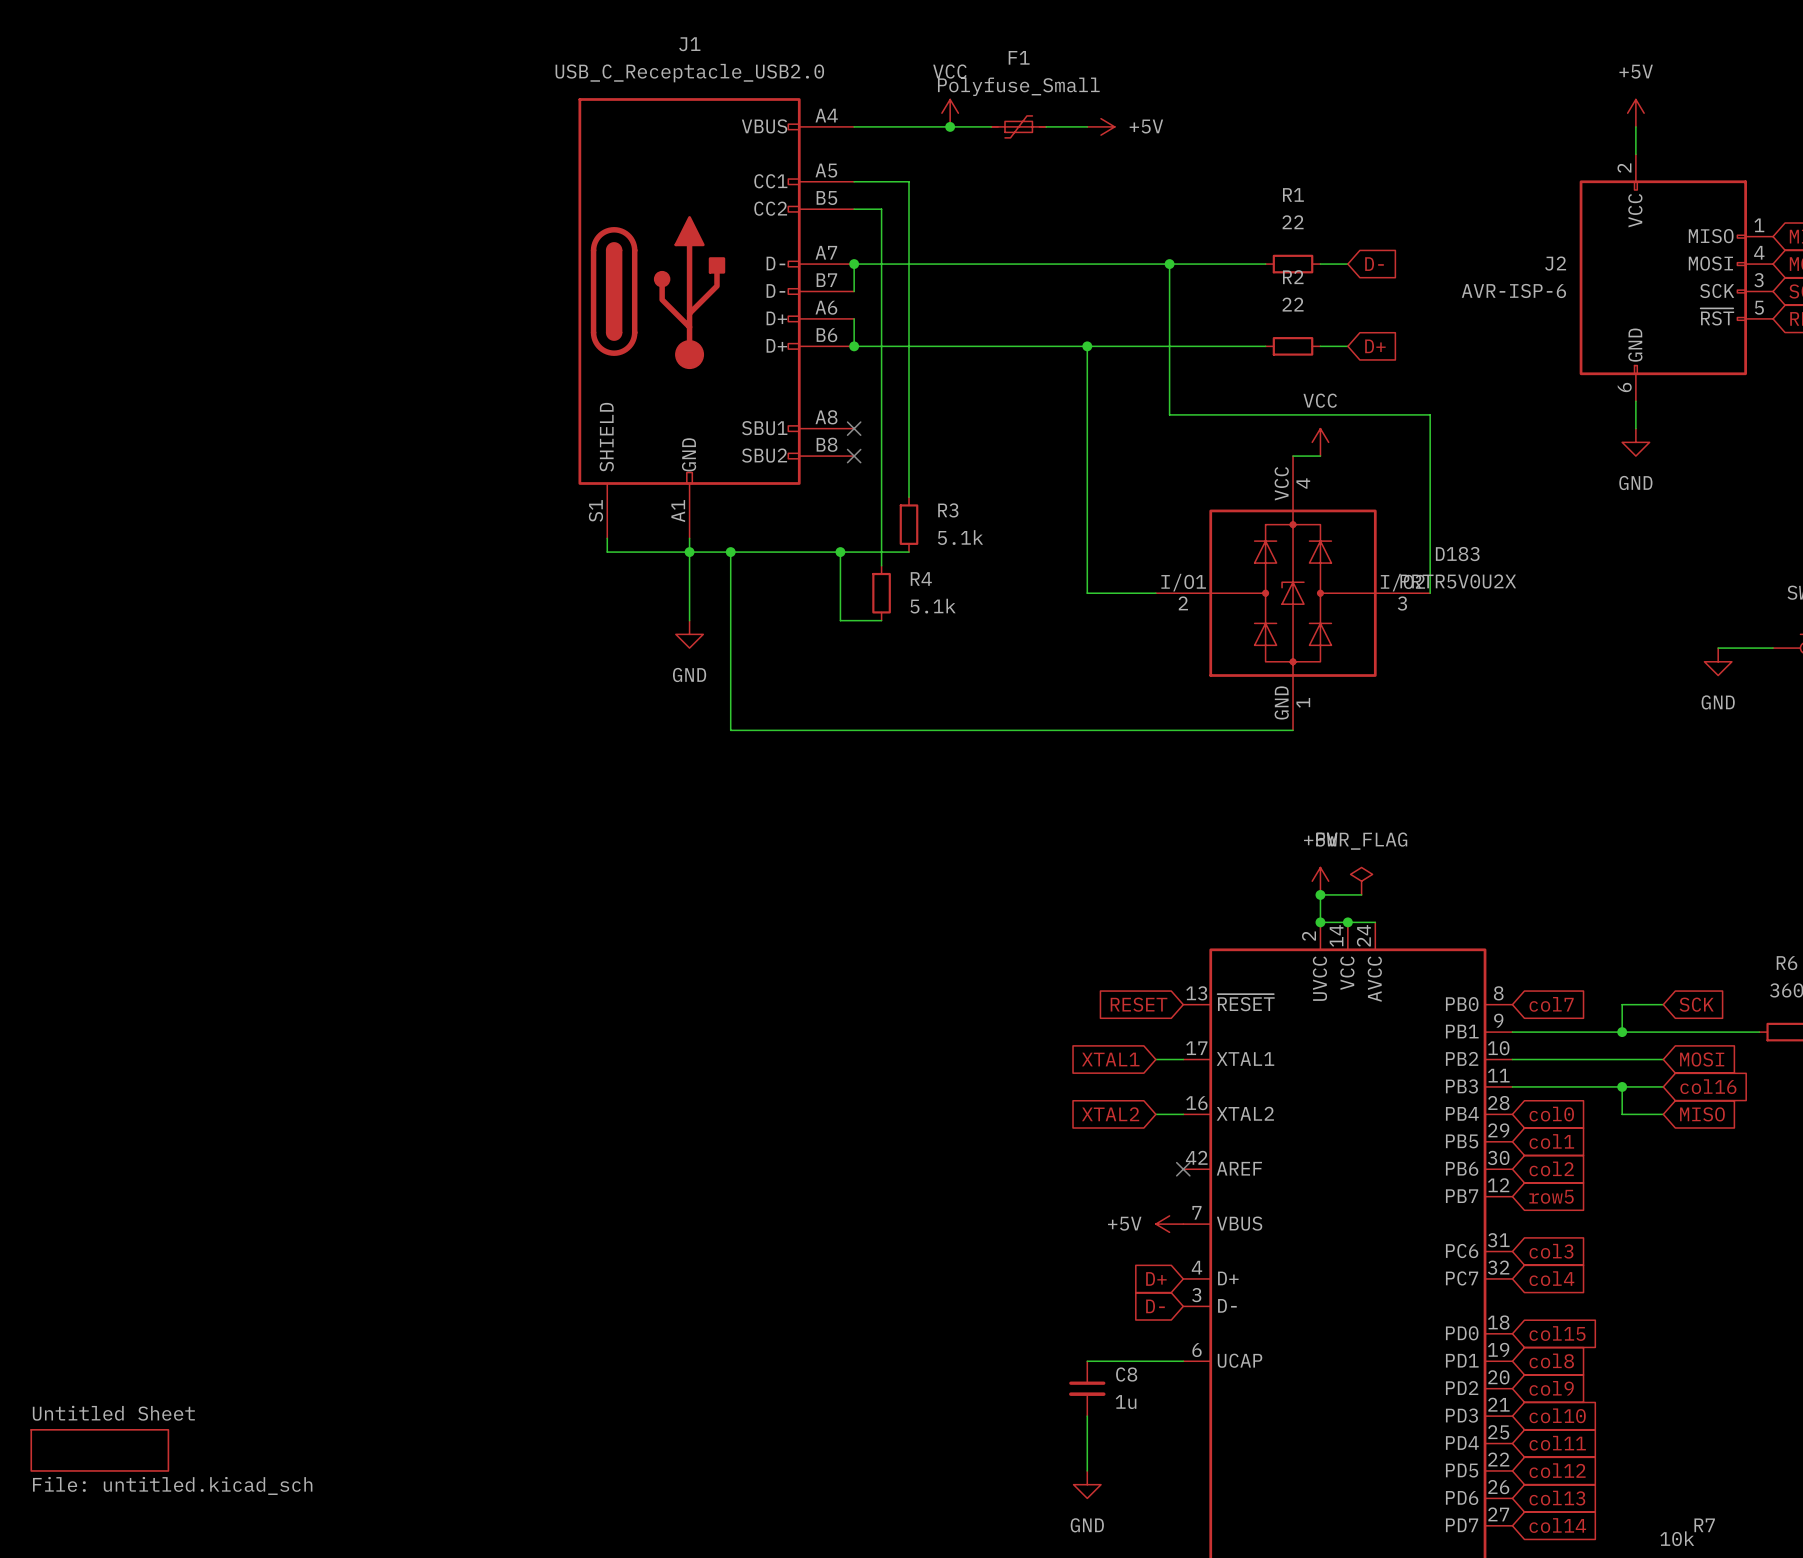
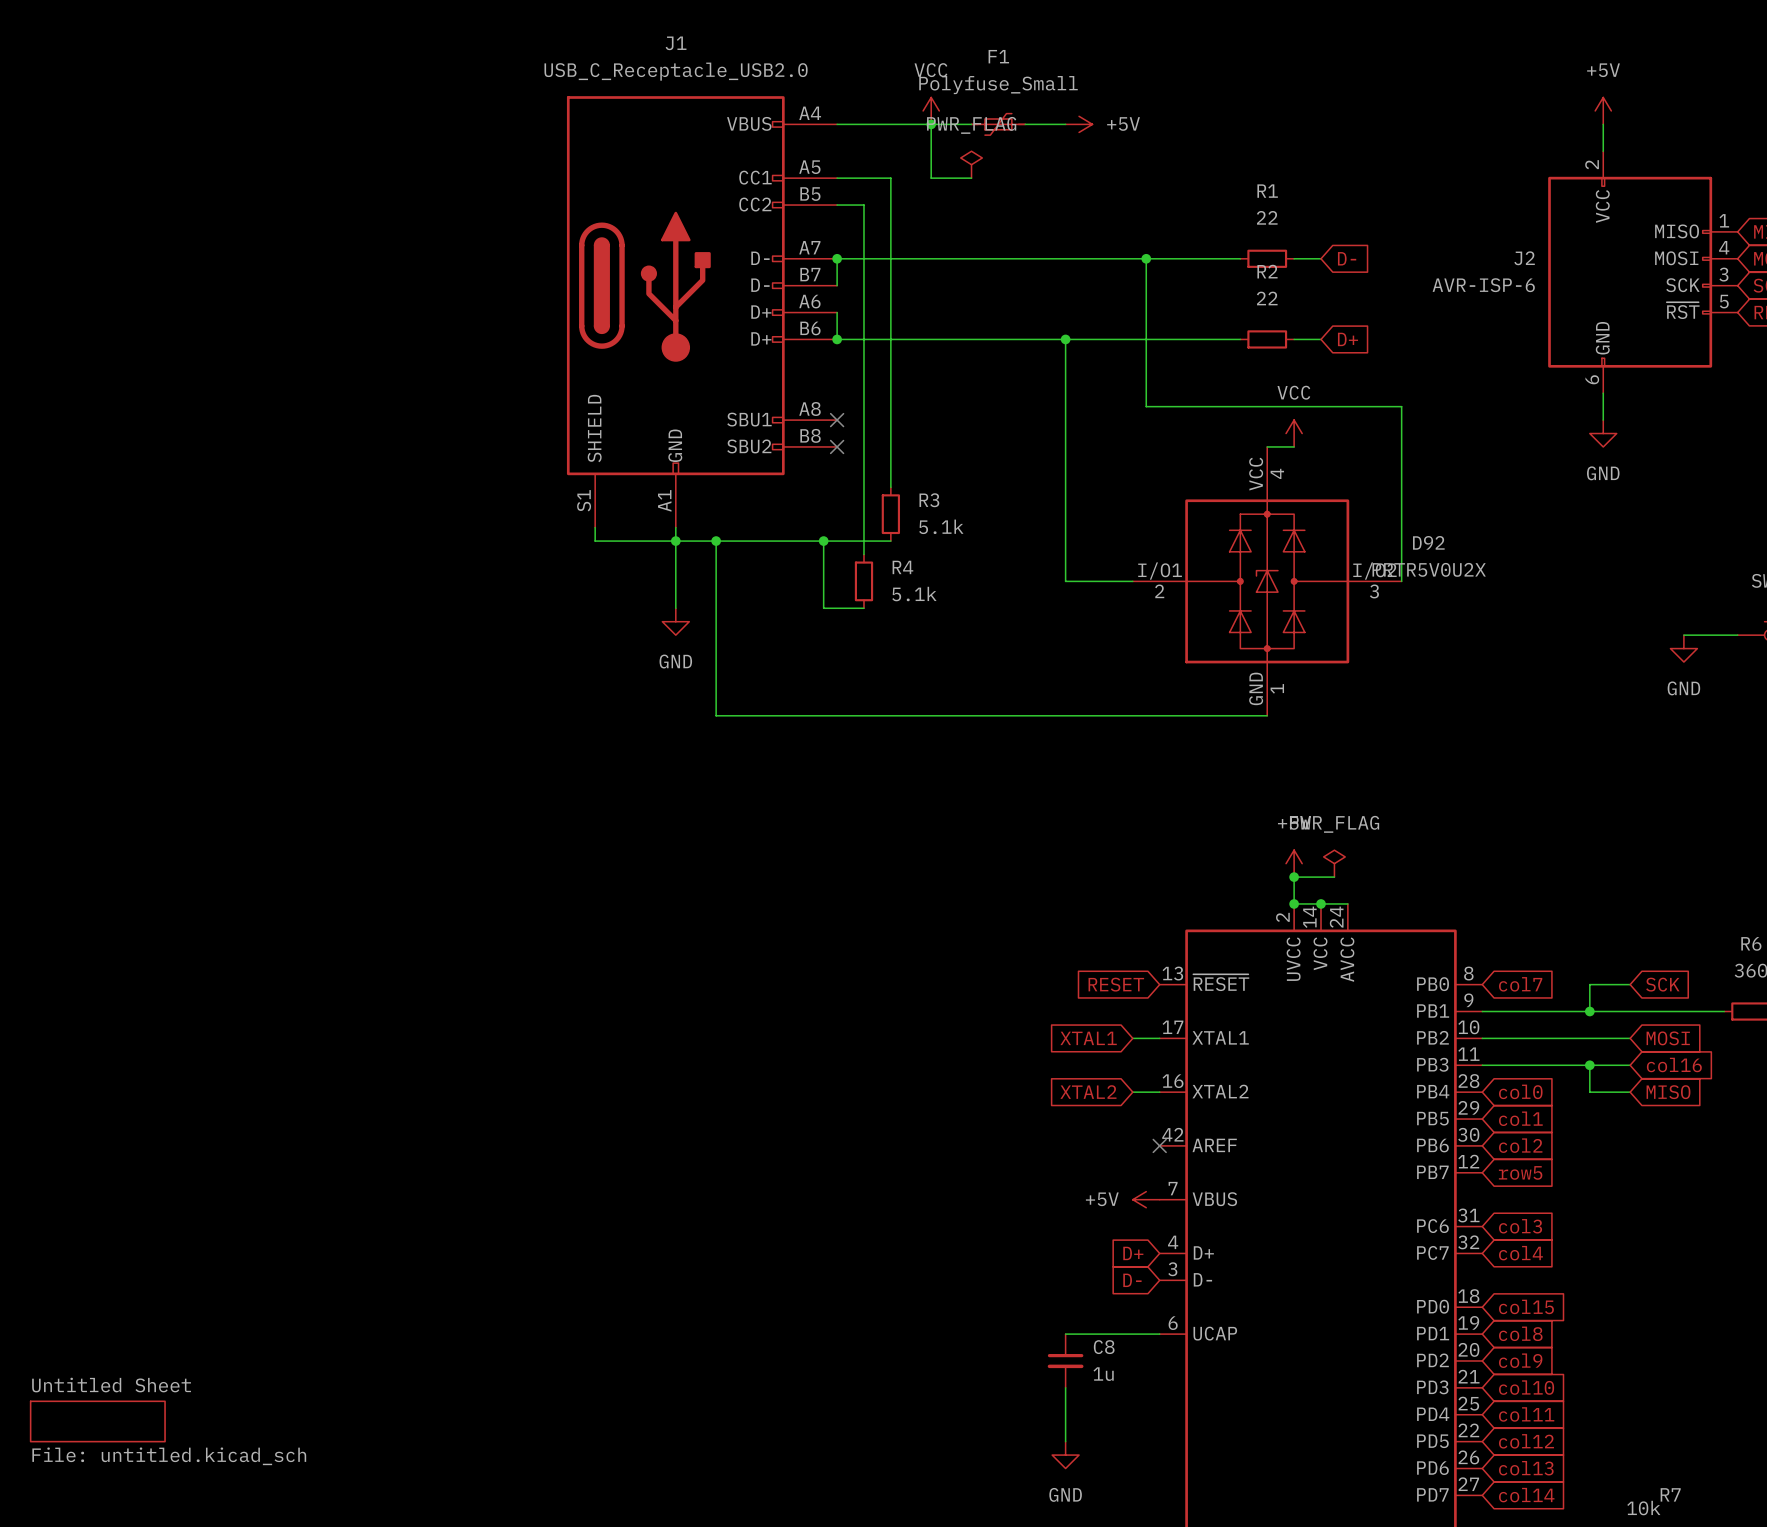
wire: none -> (931, 124) (931, 178) (971, 178)
power symbol: none -> PWR_FLAG (971, 164)
D183 name: D183 (1457, 554) -> D92 (1428, 542)

